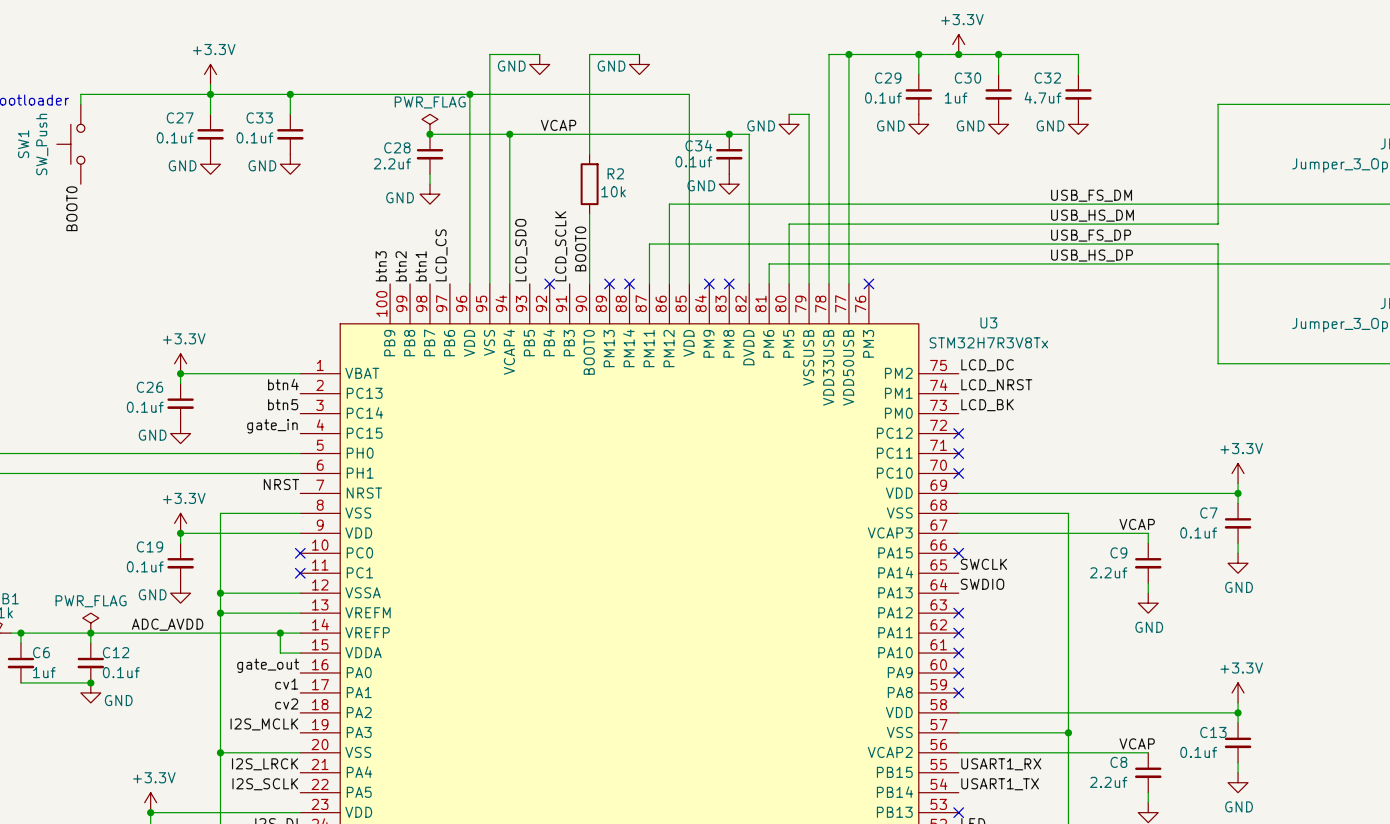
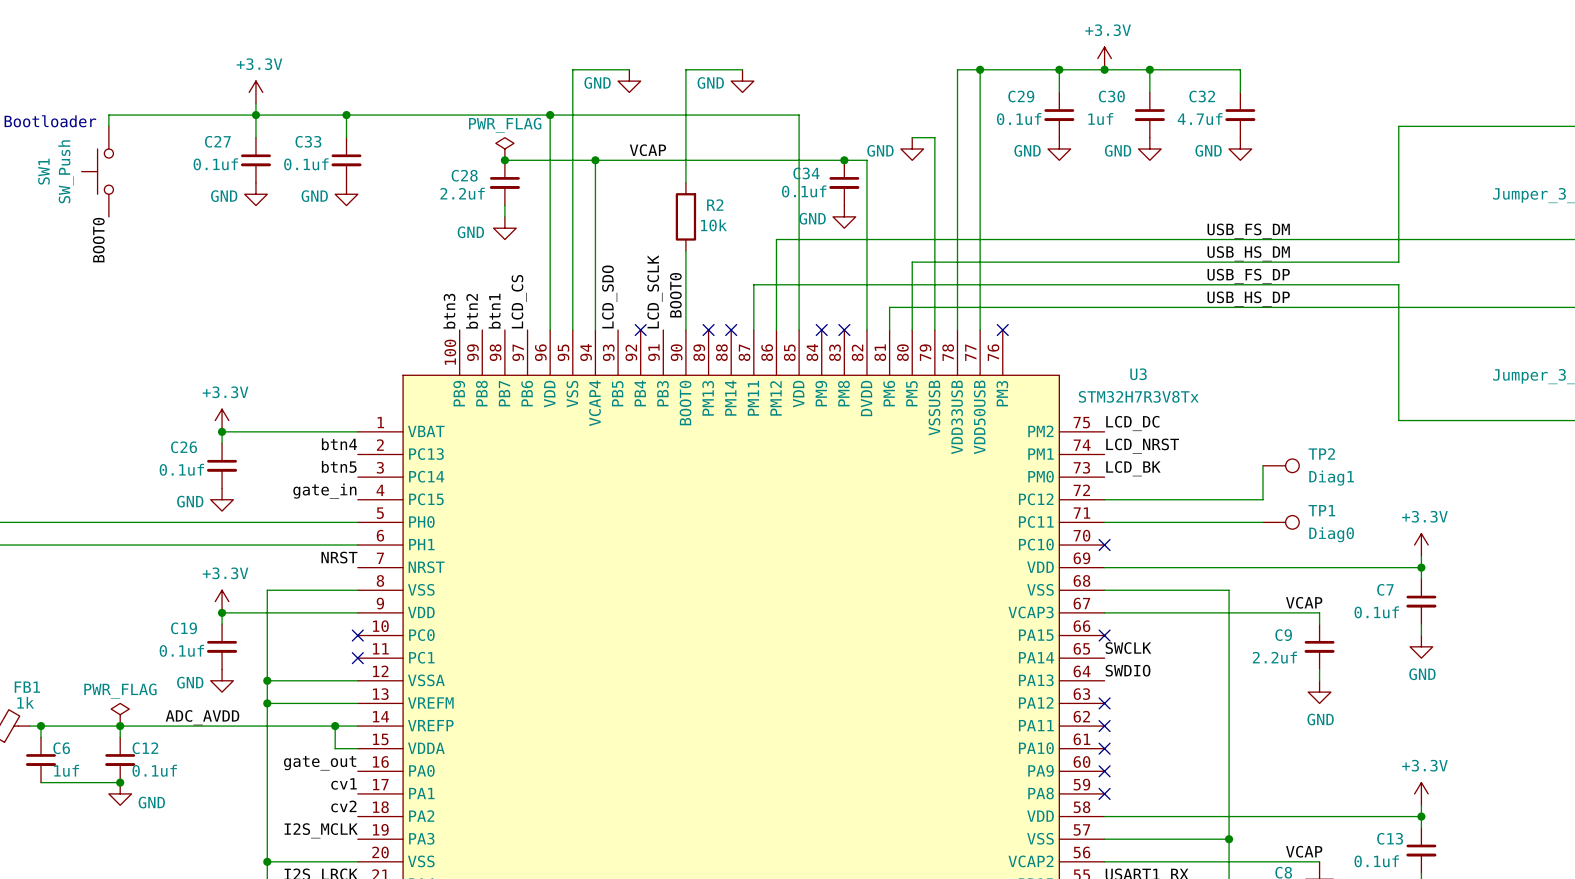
wire: none -> (1262, 465) (1262, 499) (1104, 499)
TP2: none -> Diag1 (1281, 465)
no-connect mark: (958, 433) -> none
wire: none -> (1104, 522) (1262, 522)
no-connect mark: (958, 453) -> none
TP1: none -> Diag0 (1281, 522)

